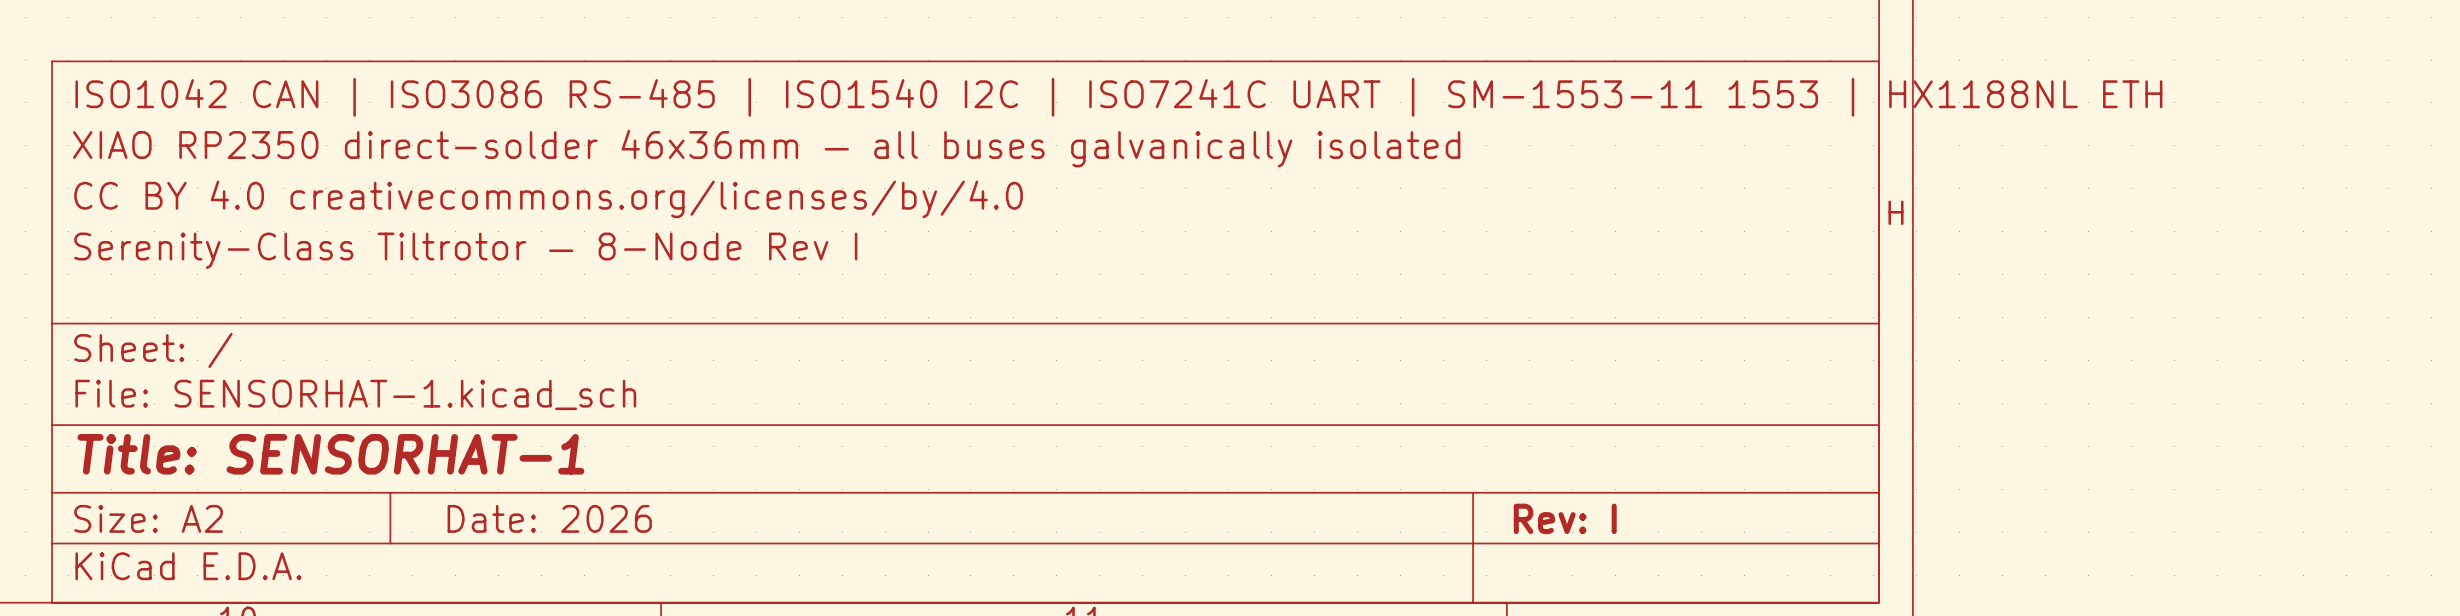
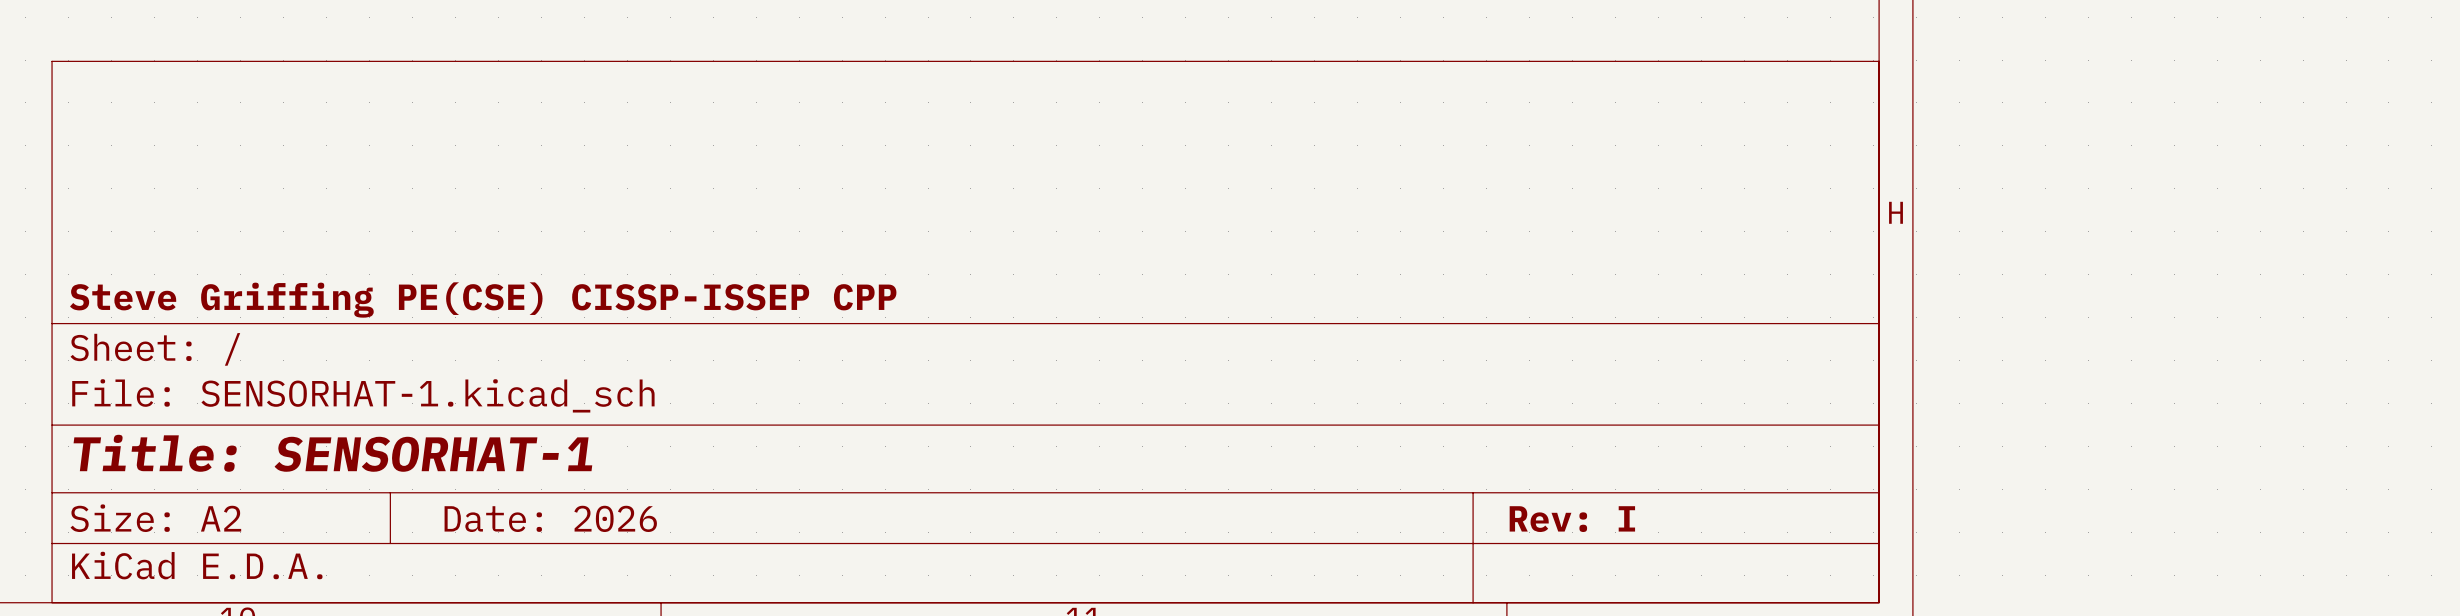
title block: ISO1042 CAN | ISO3086 RS-485 | ISO1540 I2C | ISO7241C UART | SM-1553-11 1553 | HX1188NL ETH (1118, 97) -> none
title block: XIAO RP2350 direct-solder 46x36mm — all buses galvanically isolated (766, 148) -> none
title block: CC BY 4.0 creativecommons.org/licenses/by/4.0 (548, 199) -> none
title block: Serenity-Class Tiltrotor — 8-Node Rev I (465, 250) -> none
title block: none -> Steve Griffing PE(CSE) CISSP-ISSEP CPP (483, 299)

